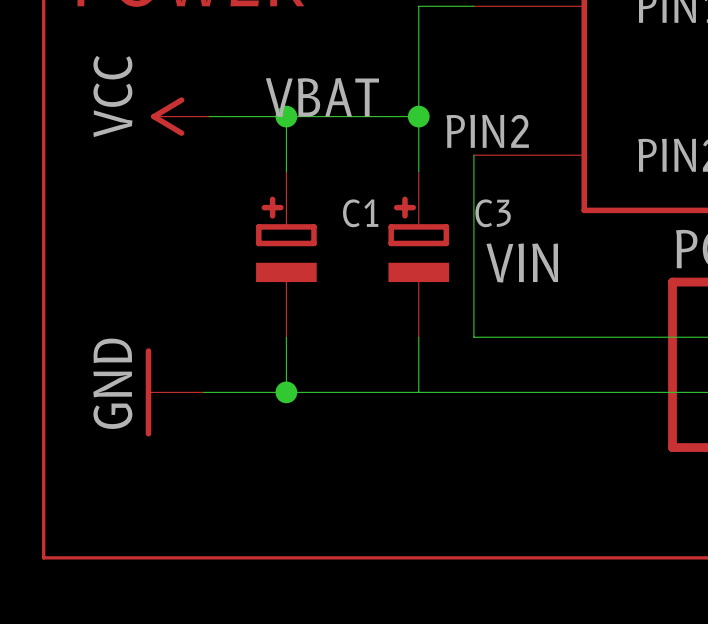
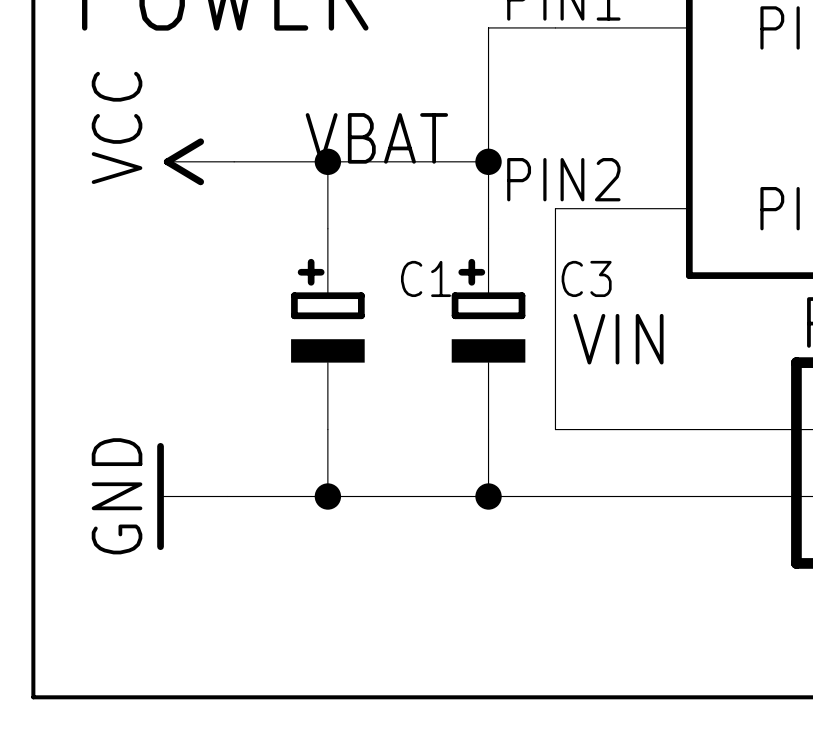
junction: none -> (488, 496)

